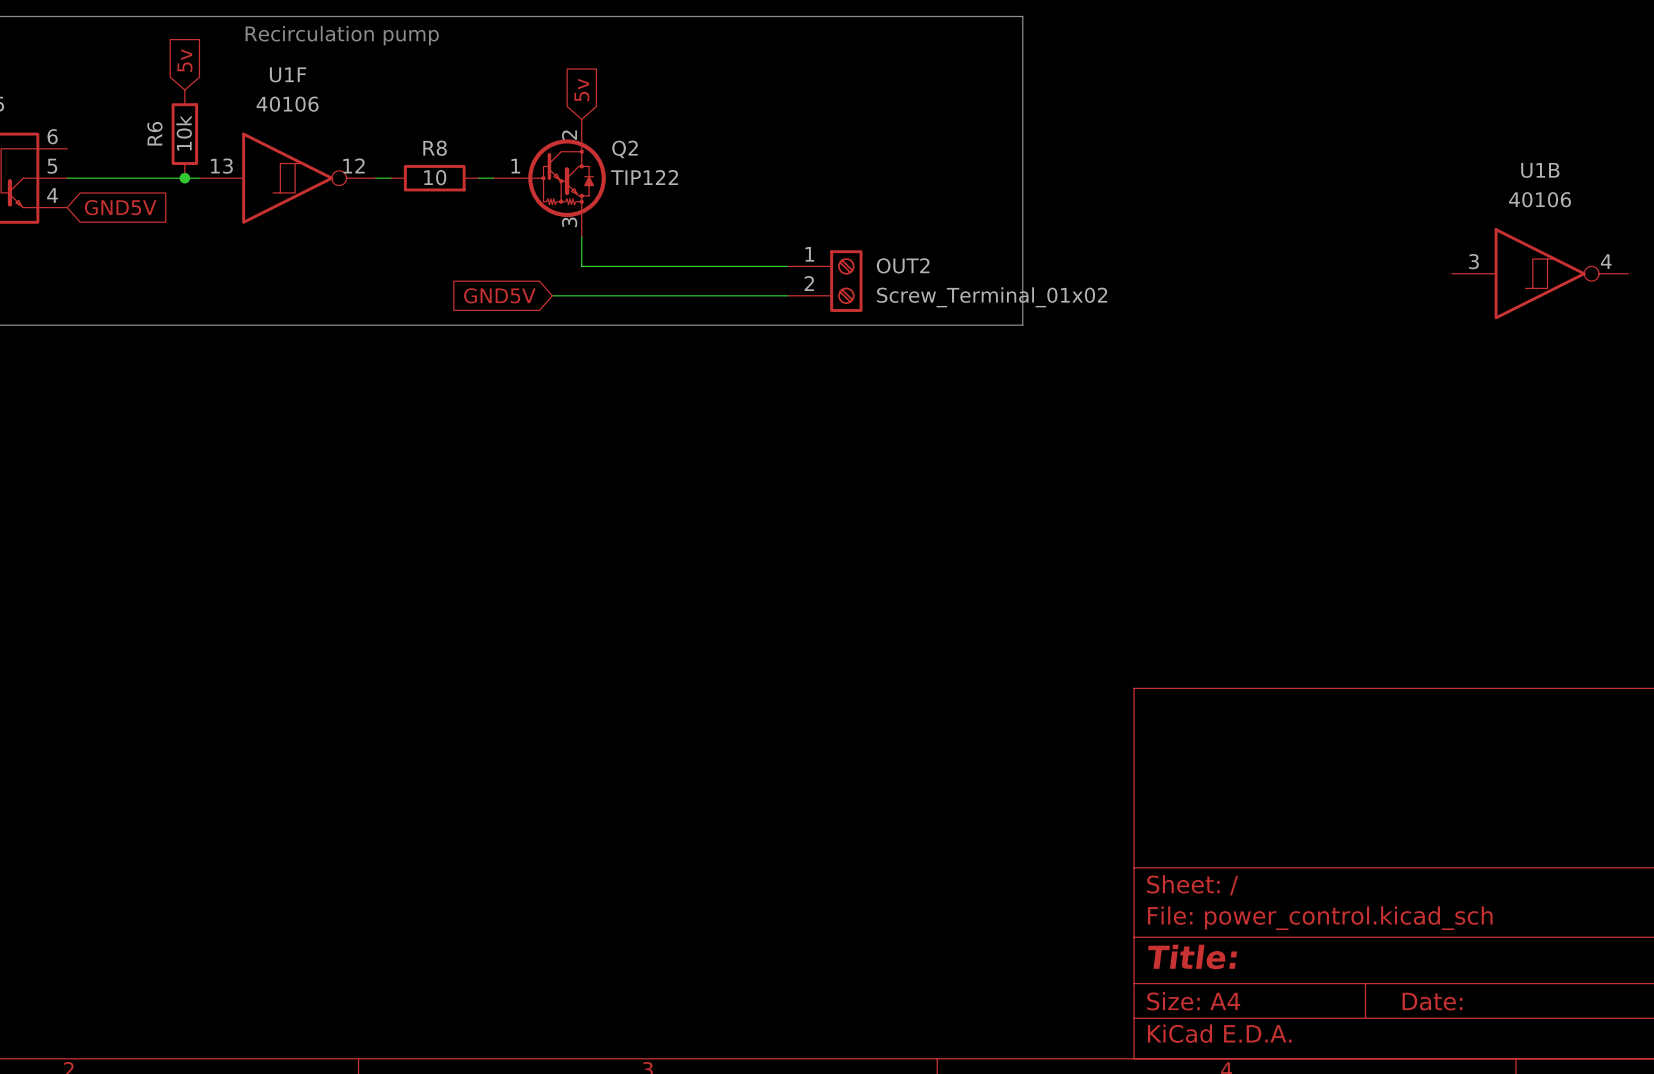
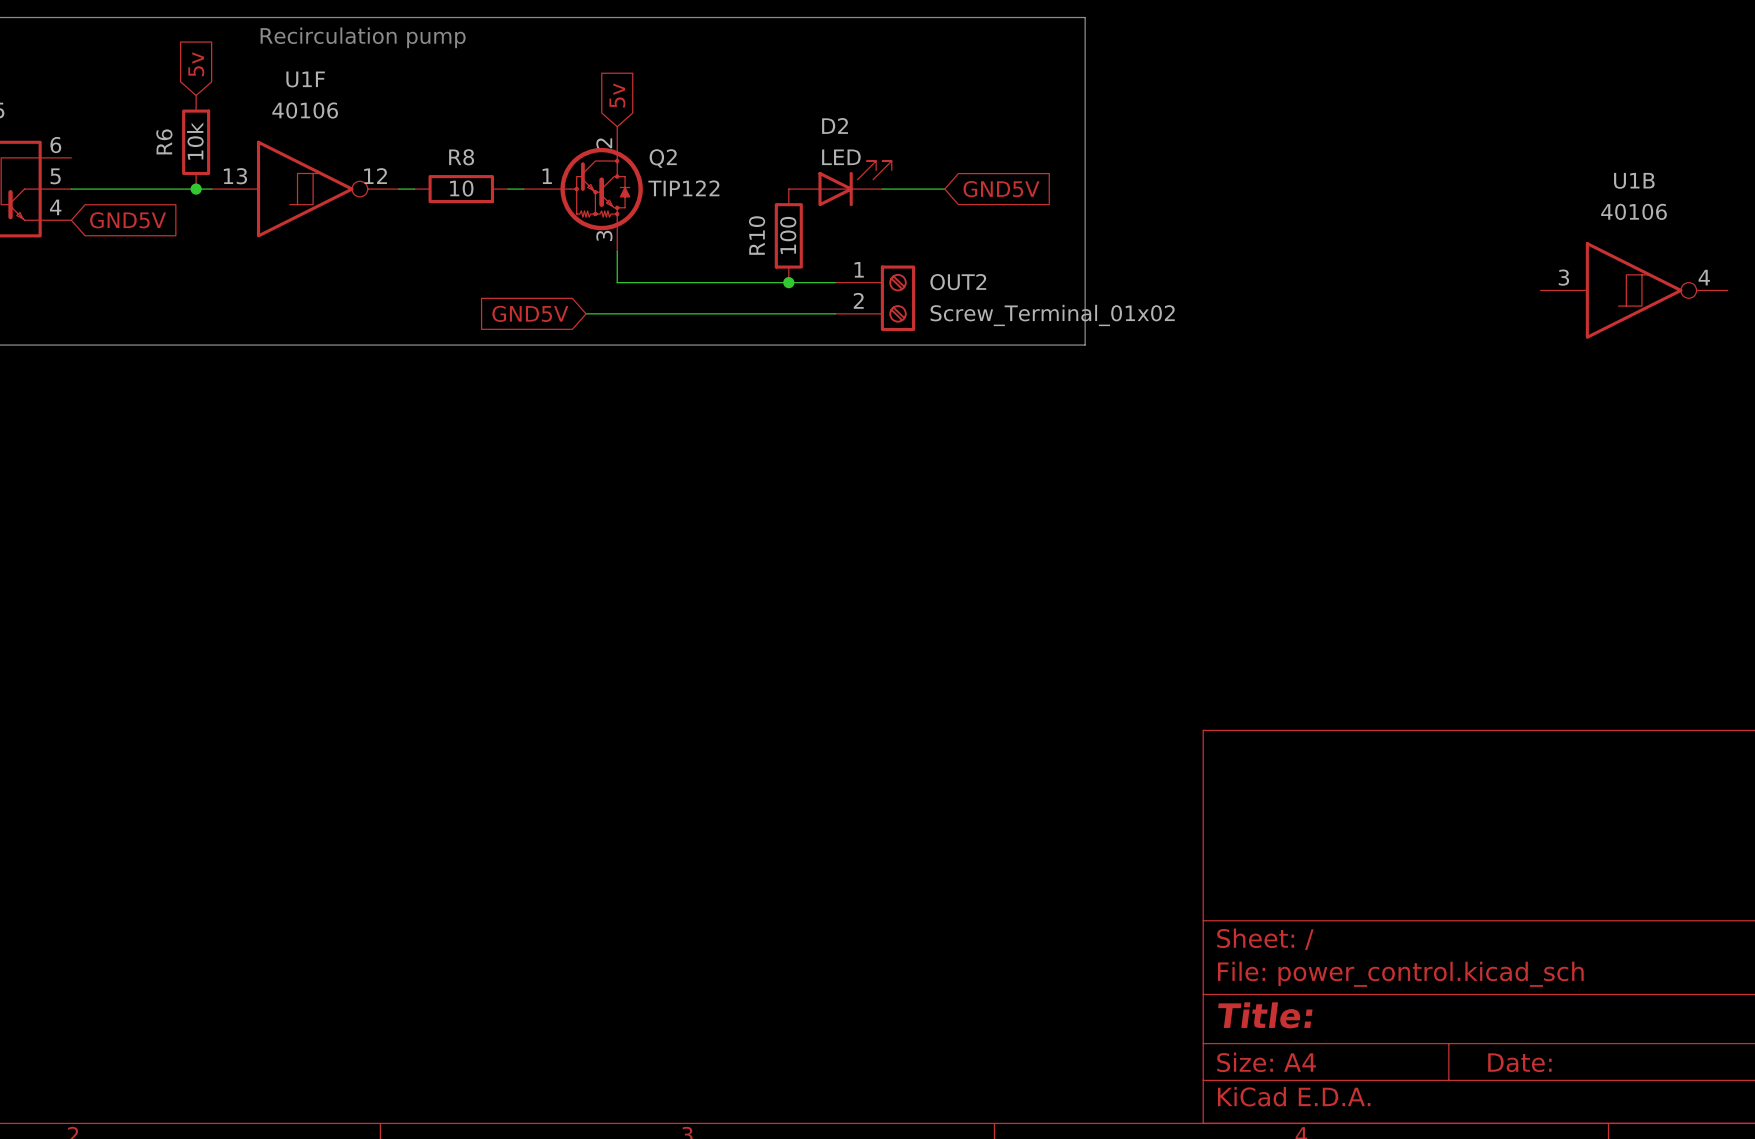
D2: none -> LED (840, 183)
wire: none -> (882, 189) (944, 189)
global label: none -> GND5V (1001, 189)
R10: none -> 100 (788, 235)
junction: none -> (788, 282)

